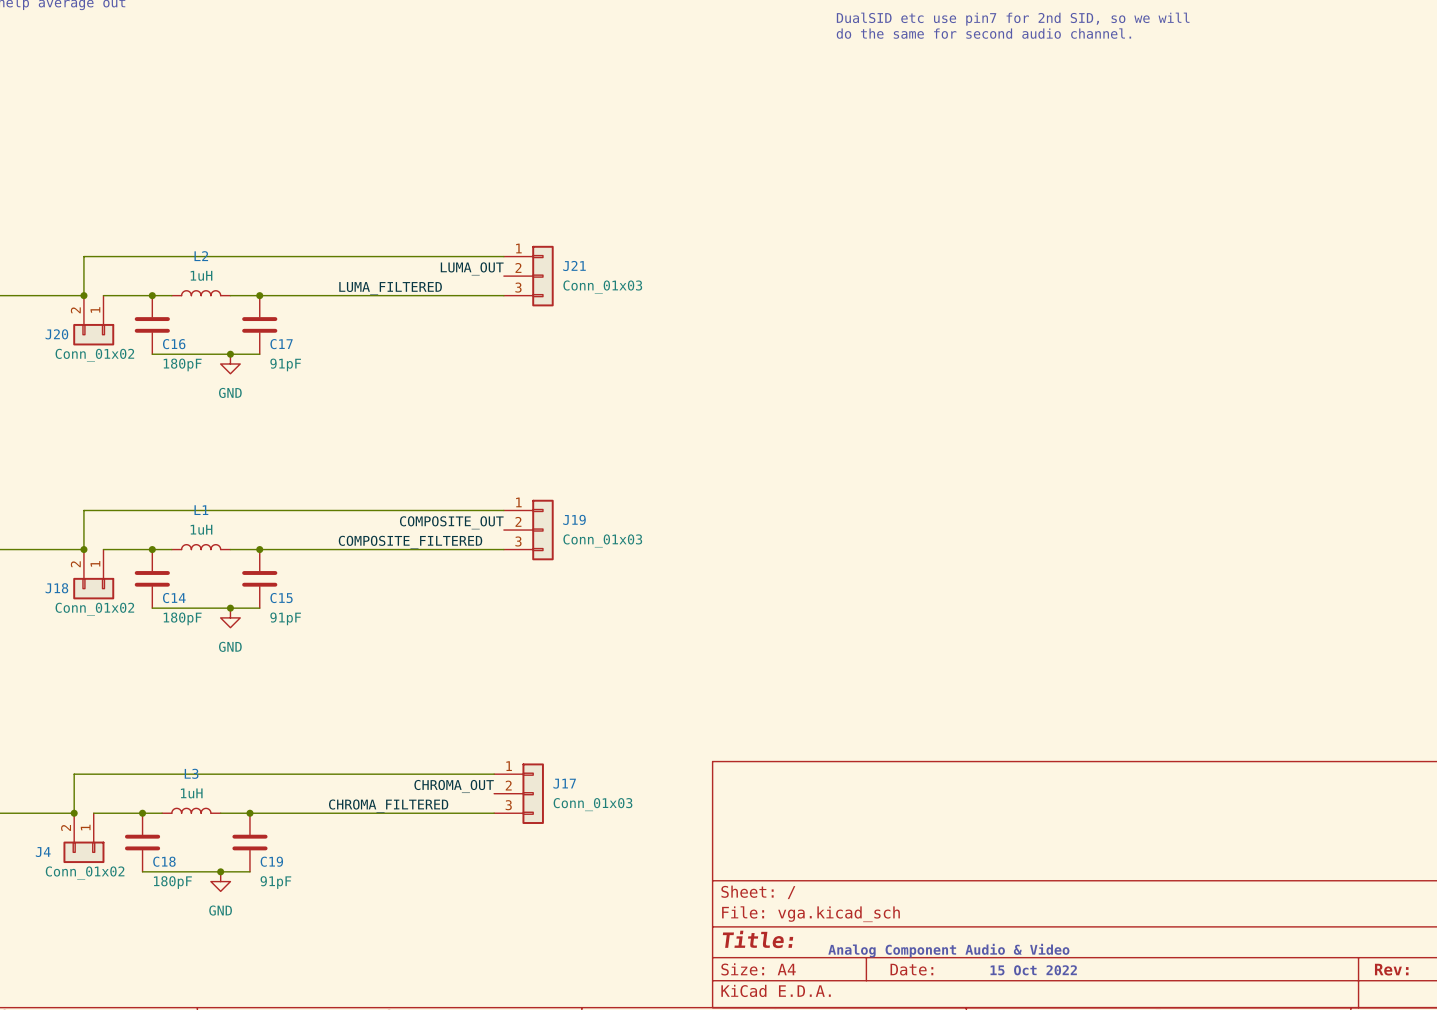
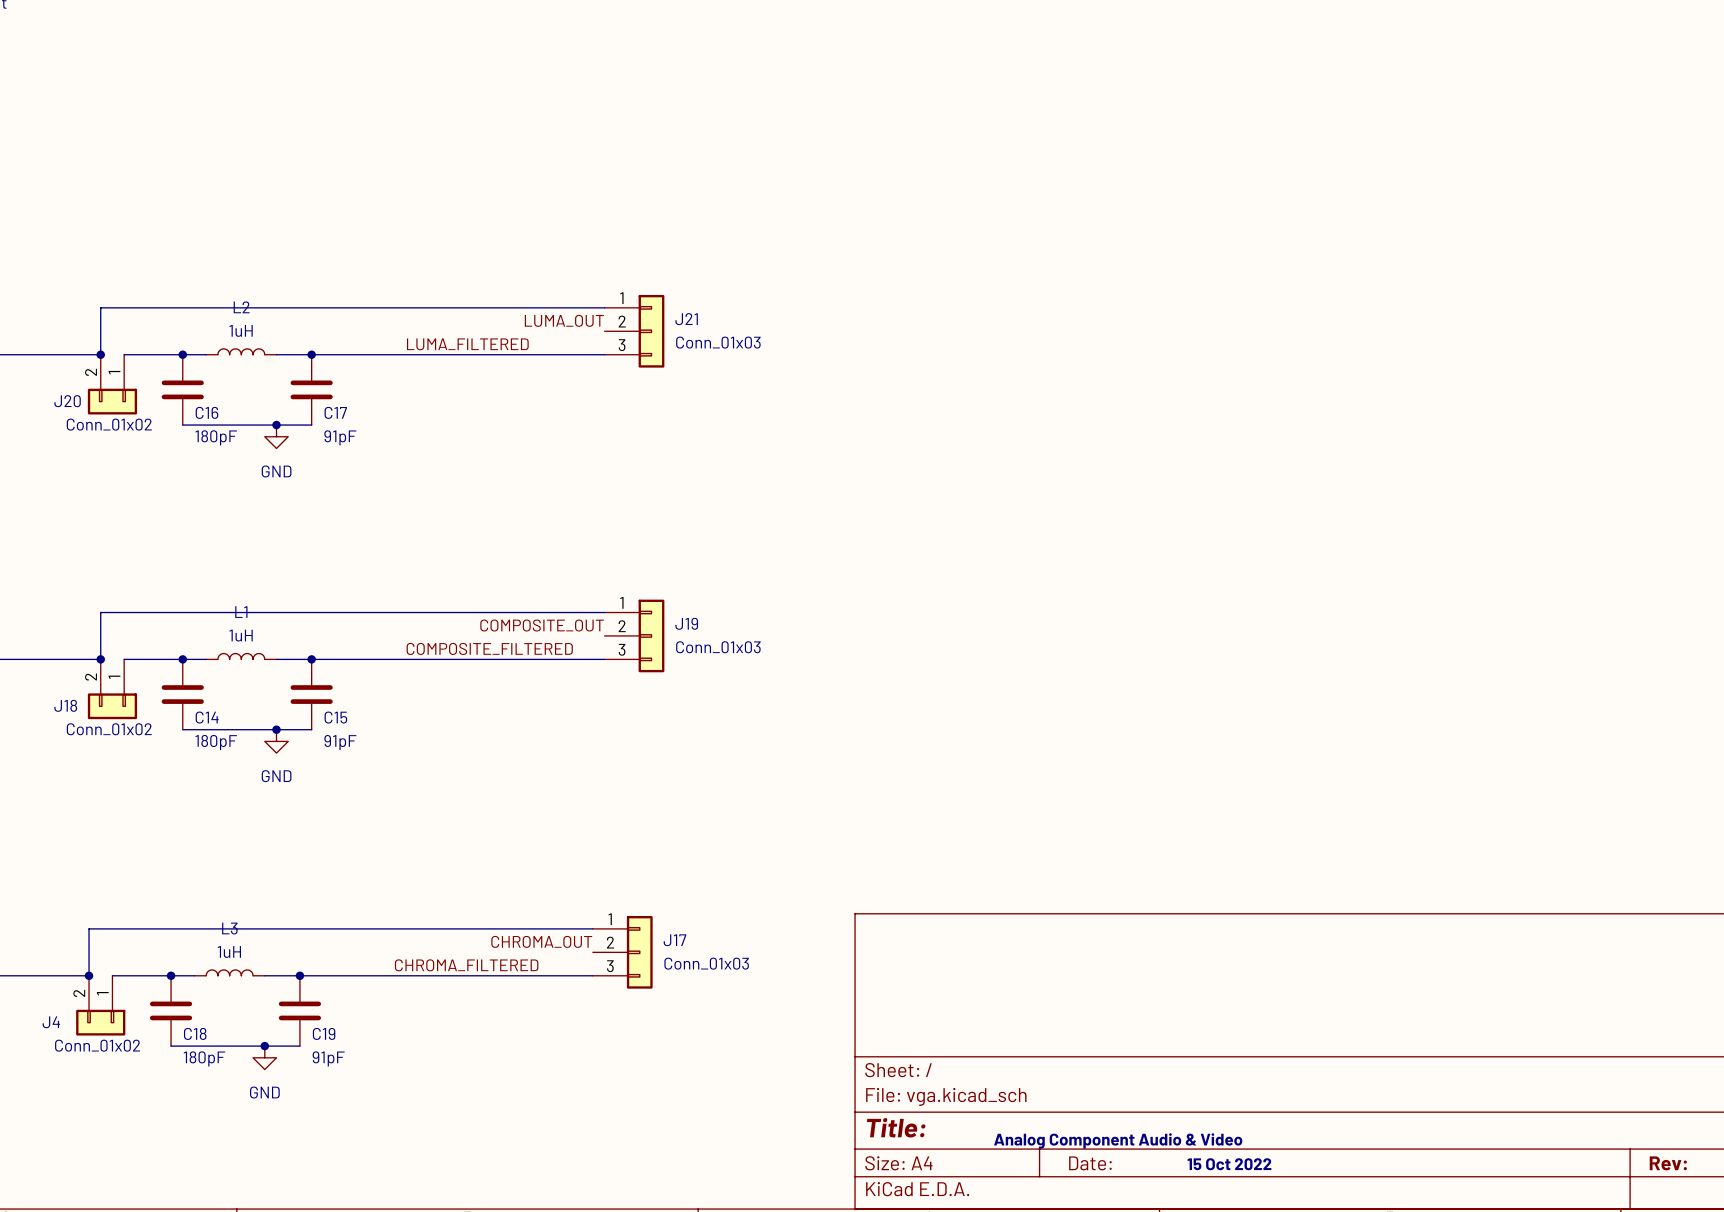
text: DualSID etc use pin7 for 2nd SID, so we will (1013, 19) -> none
text: do the same for second audio channel. (983, 33) -> none

